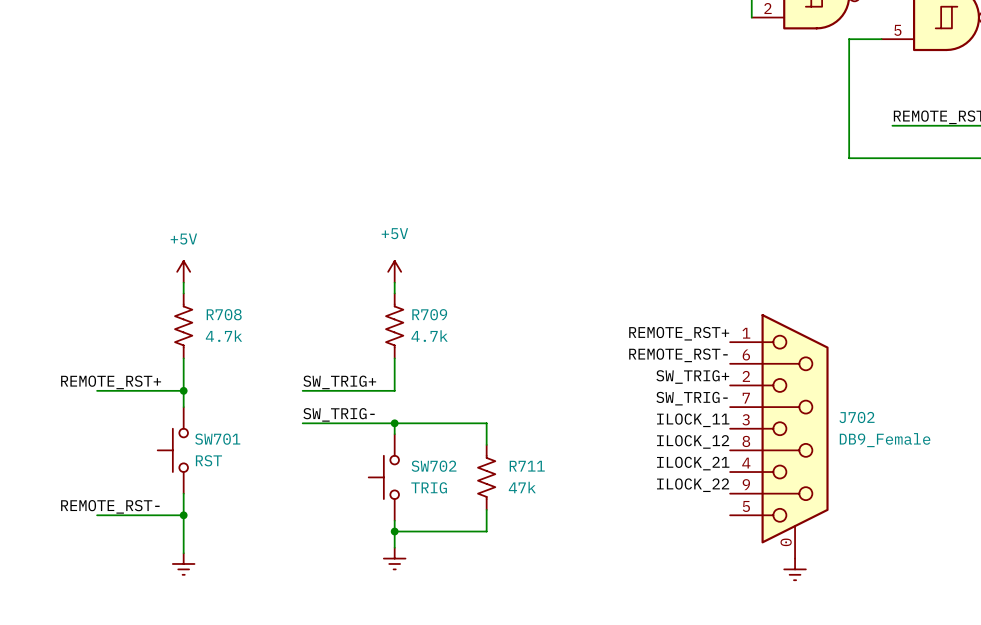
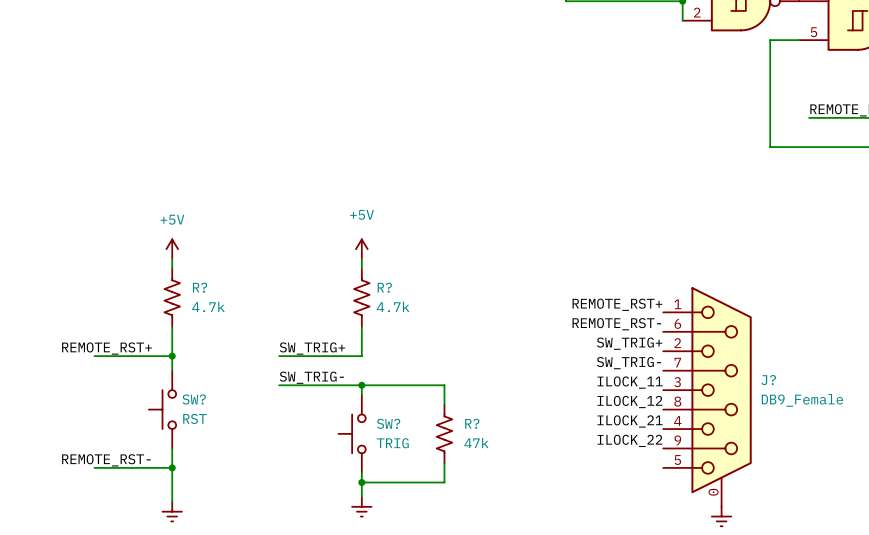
R708 name: R708 (224, 314) -> R? (200, 287)
R709 name: R709 (429, 314) -> R? (384, 287)
J702 name: J702 (857, 417) -> J? (768, 380)
SW701 name: SW701 (217, 439) -> SW? (194, 399)
SW702 name: SW702 (434, 466) -> SW? (388, 423)
R711 name: R711 (527, 466) -> R? (472, 423)

